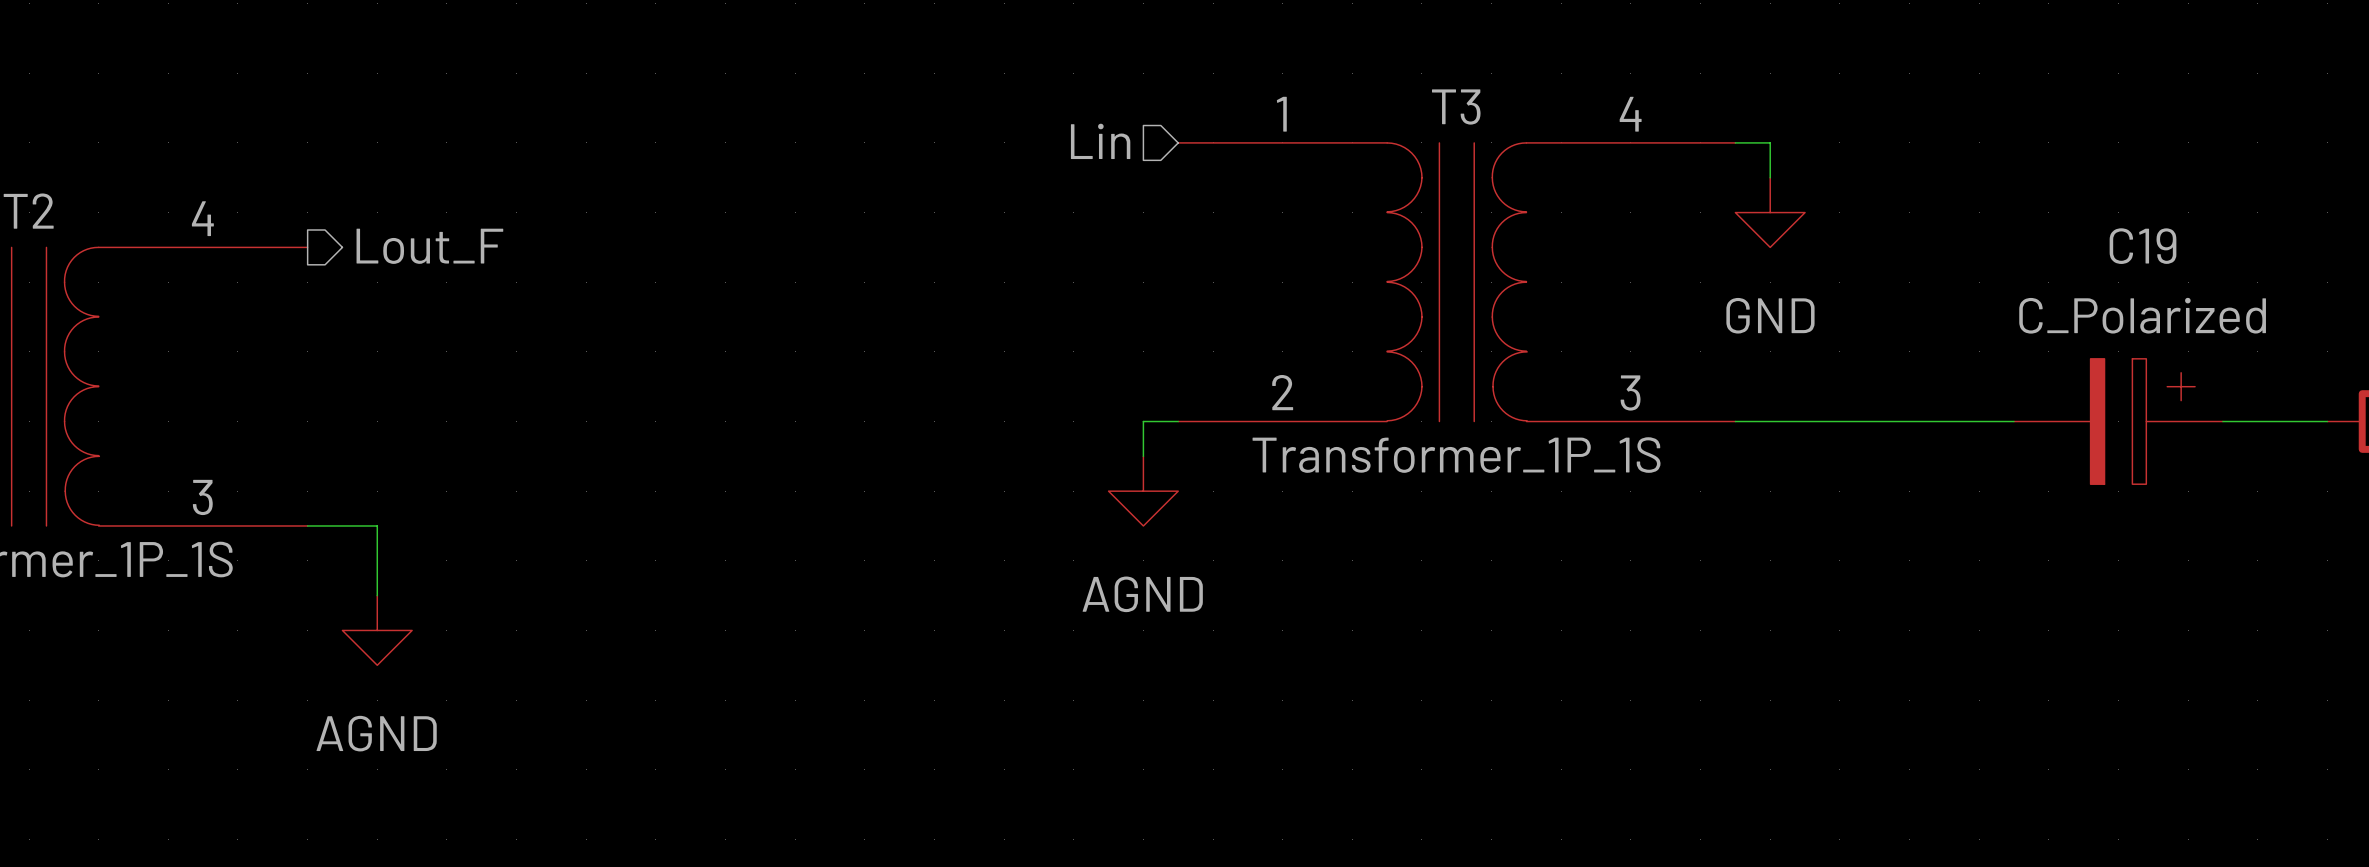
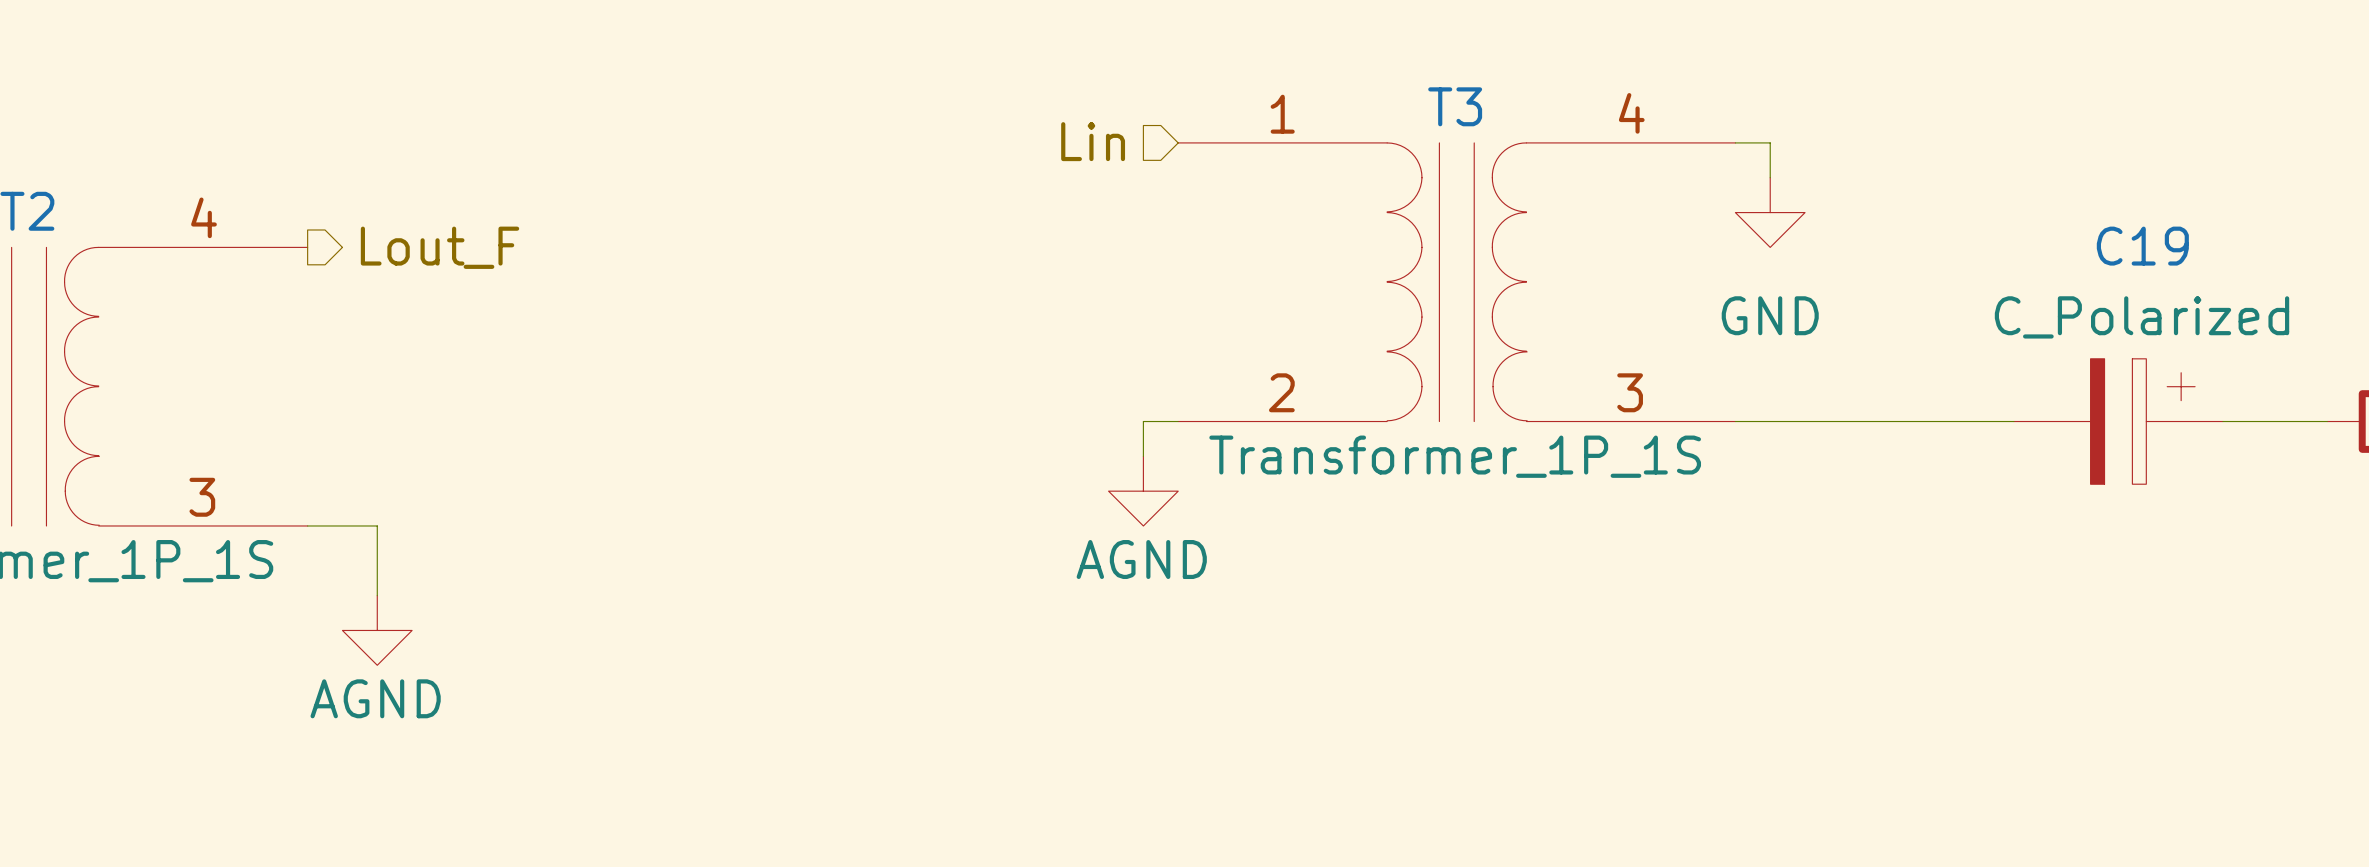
power symbol text position: AGND (1142, 594) -> AGND (1141, 559)
power symbol text position: AGND (376, 733) -> AGND (375, 698)

